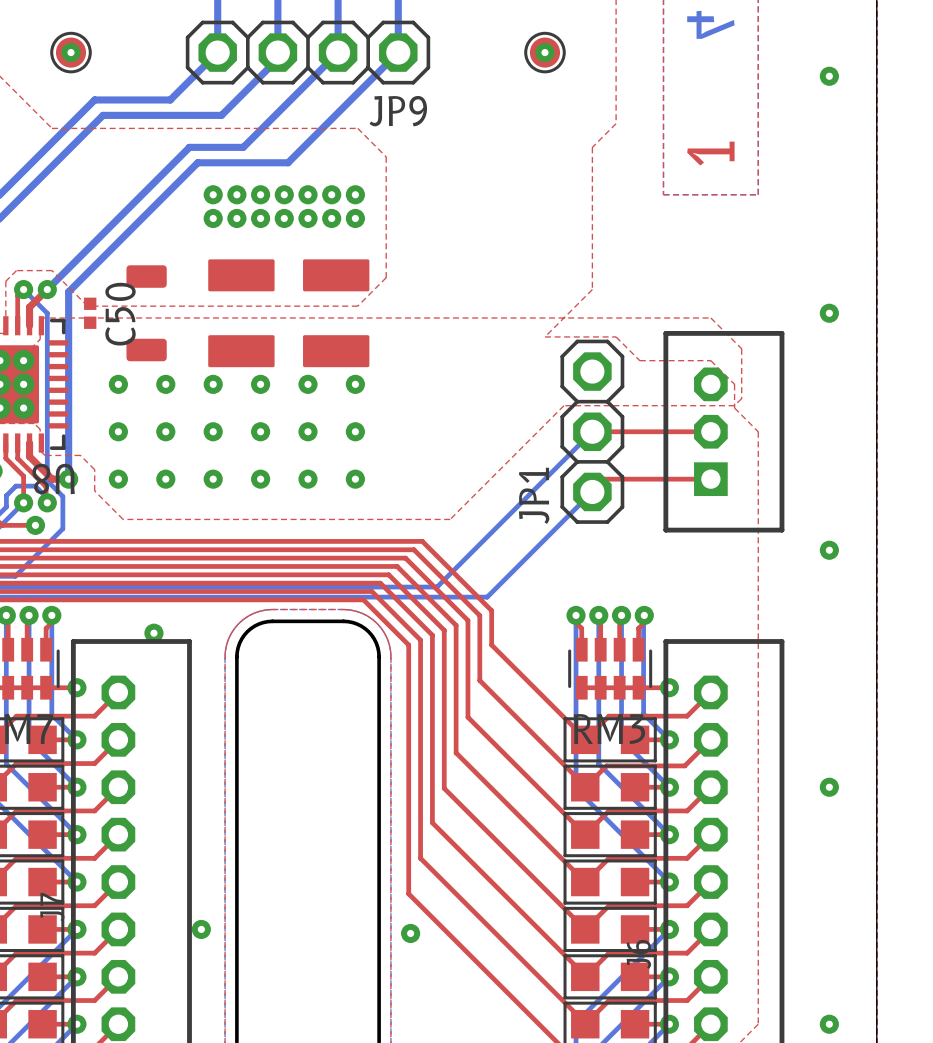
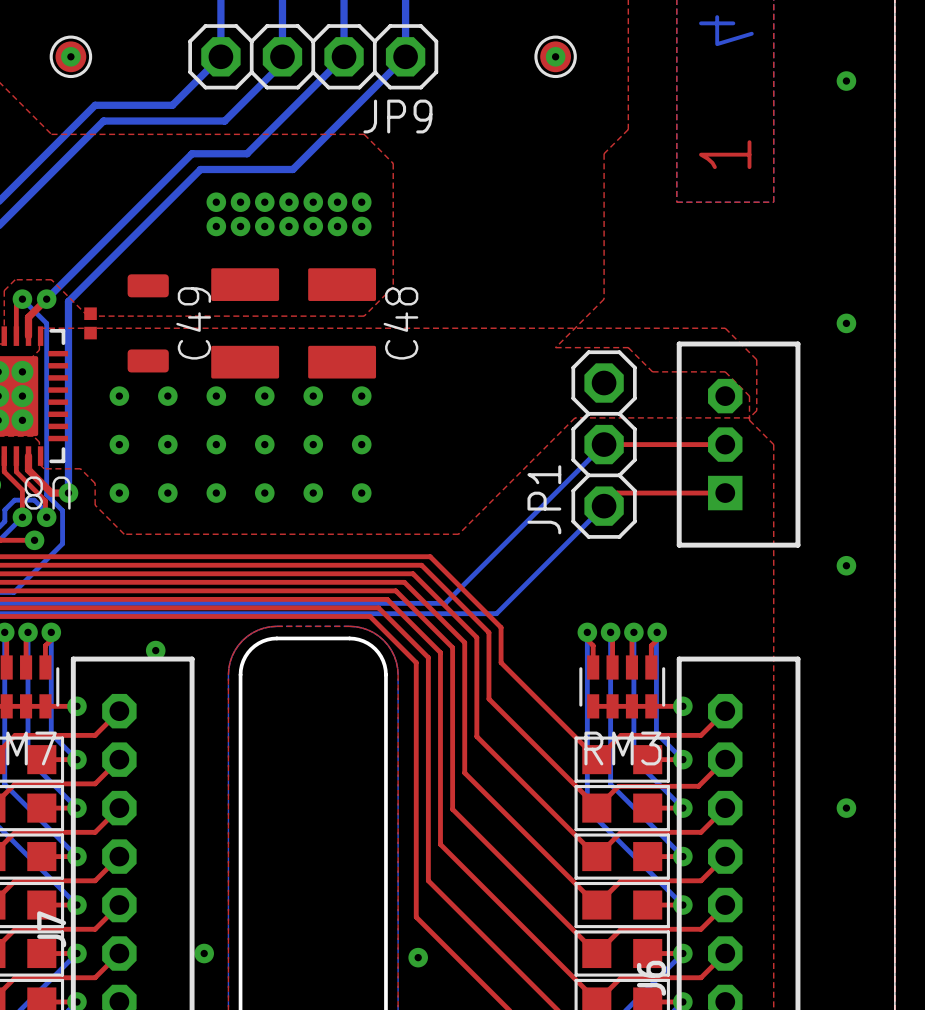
C48 name: none -> C48 (400, 323)
C50 name: C50 (120, 314) -> none
C49 name: none -> C49 (193, 323)

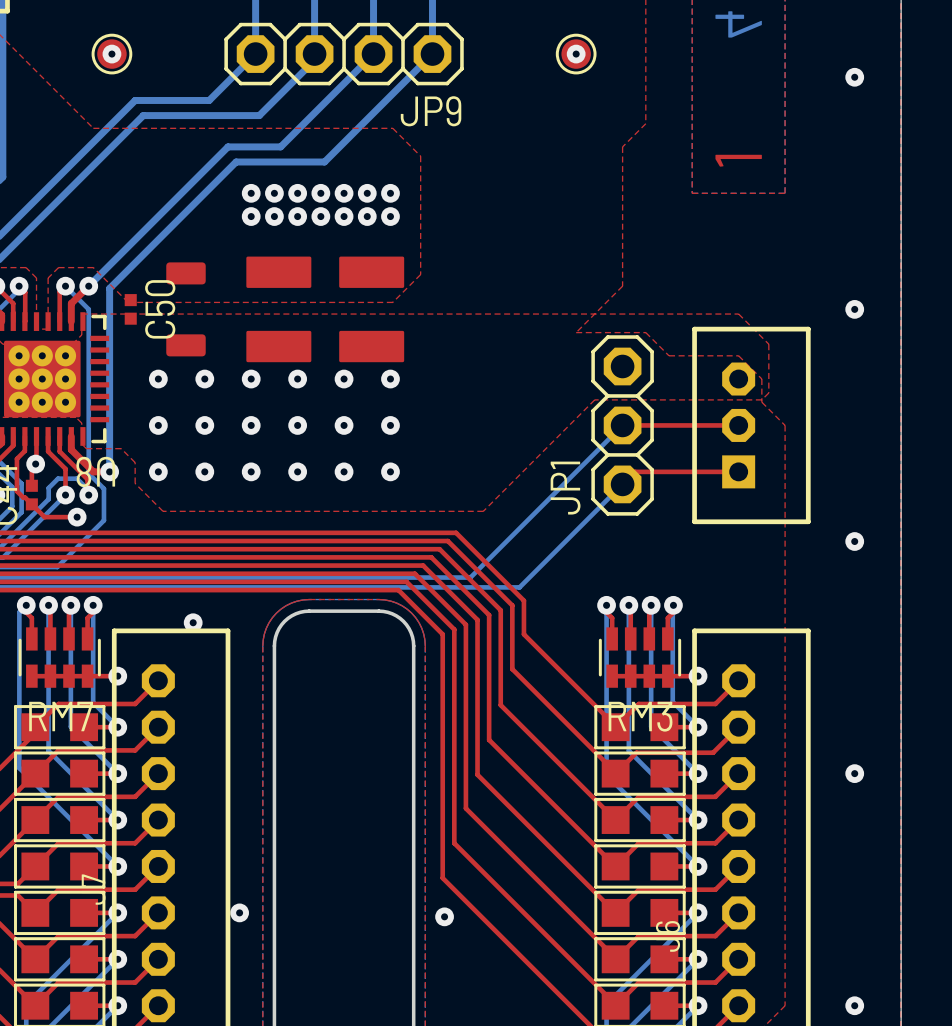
C50 name: none -> C50 (160, 309)
C49 name: C49 (193, 323) -> none
C48 name: C48 (400, 323) -> none

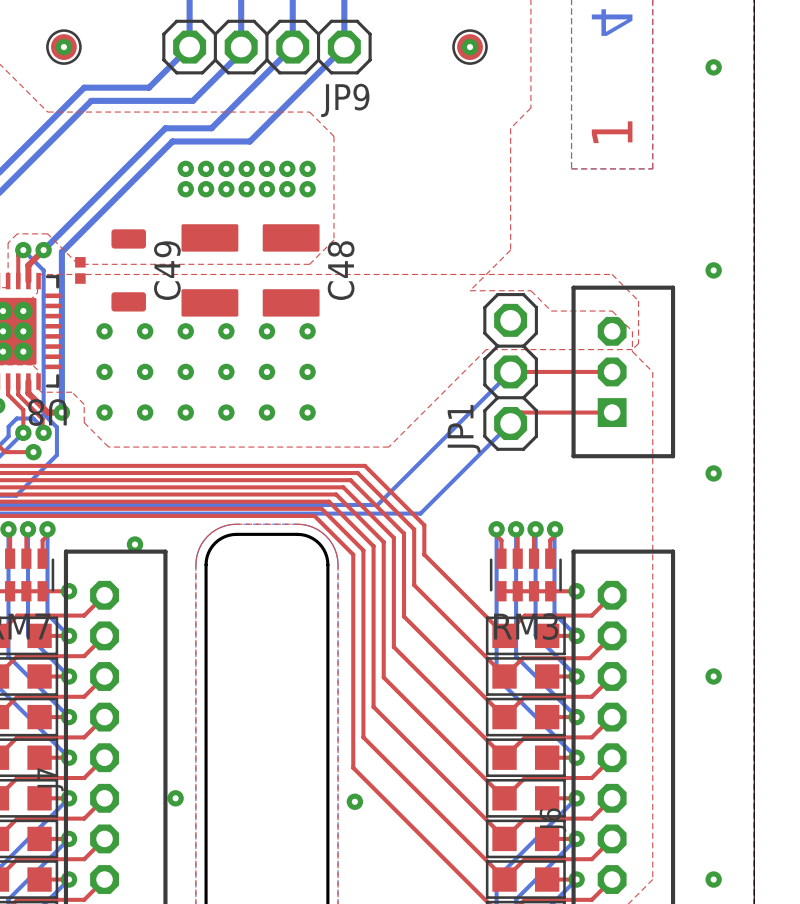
C50 name: C50 (160, 309) -> none
C49 name: none -> C49 (167, 270)
C48 name: none -> C48 (341, 270)

